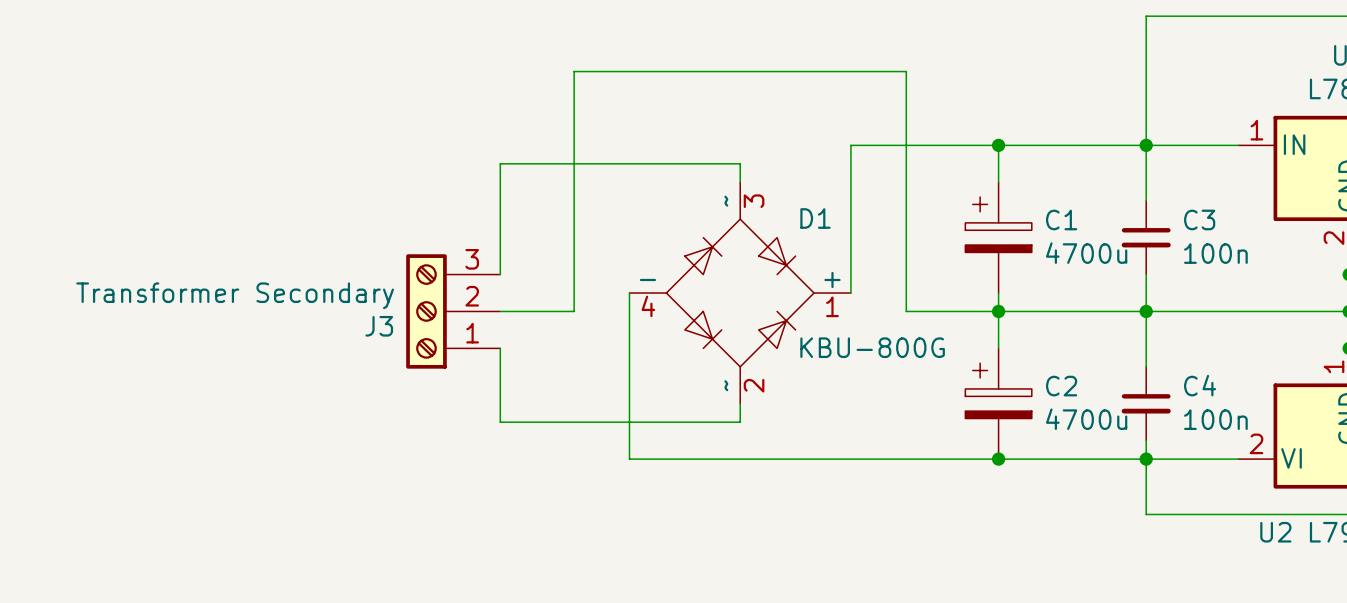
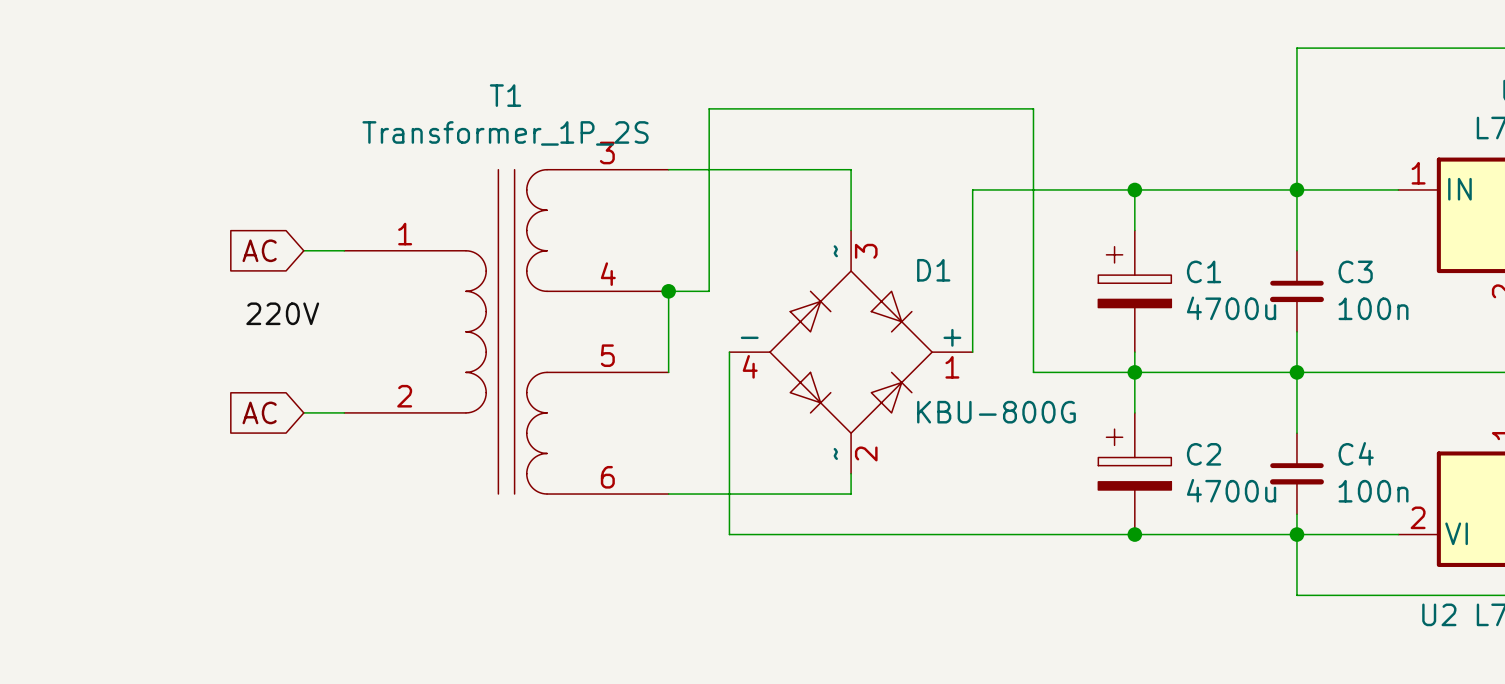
wire: (611, 71) (574, 71) (574, 237) -> (709, 108) (709, 291) (668, 291)
wire: (740, 163) (500, 163) (500, 274) -> (851, 210) (851, 169) (668, 169)
global label: none -> AC (259, 250)
wire: none -> (303, 250) (344, 250)
junction: none -> (668, 291)
label: none -> 220V (282, 313)
T1: none -> Transformer_1P_2S (506, 331)
J3: Transformer Secondary (453, 311) -> none
global label: none -> AC (259, 412)
wire: none -> (303, 412) (344, 412)
wire: (500, 348) (500, 422) (574, 422) -> none

